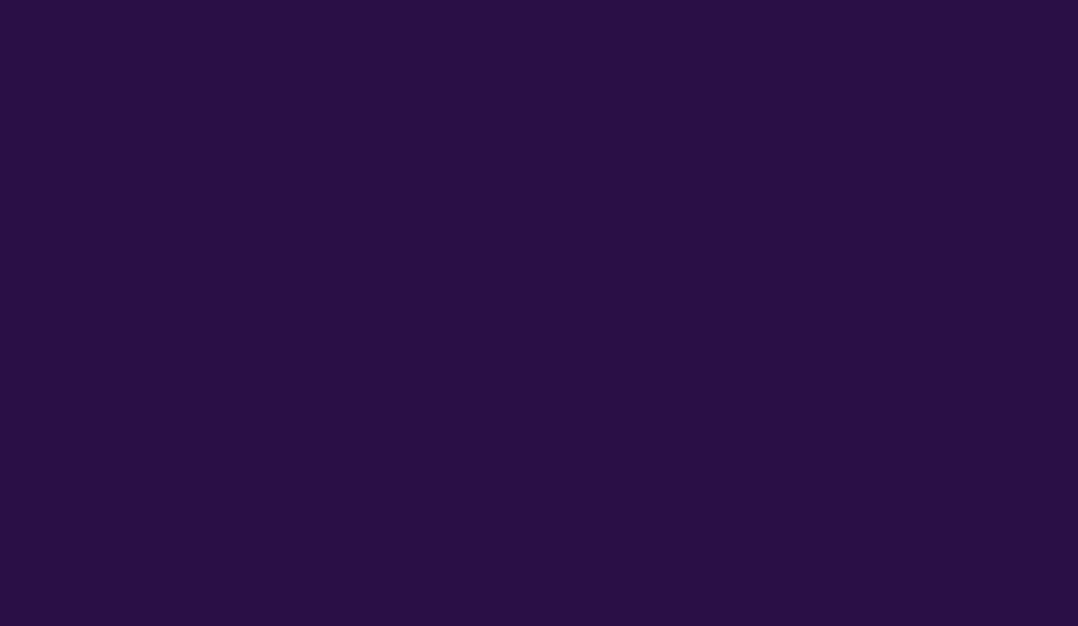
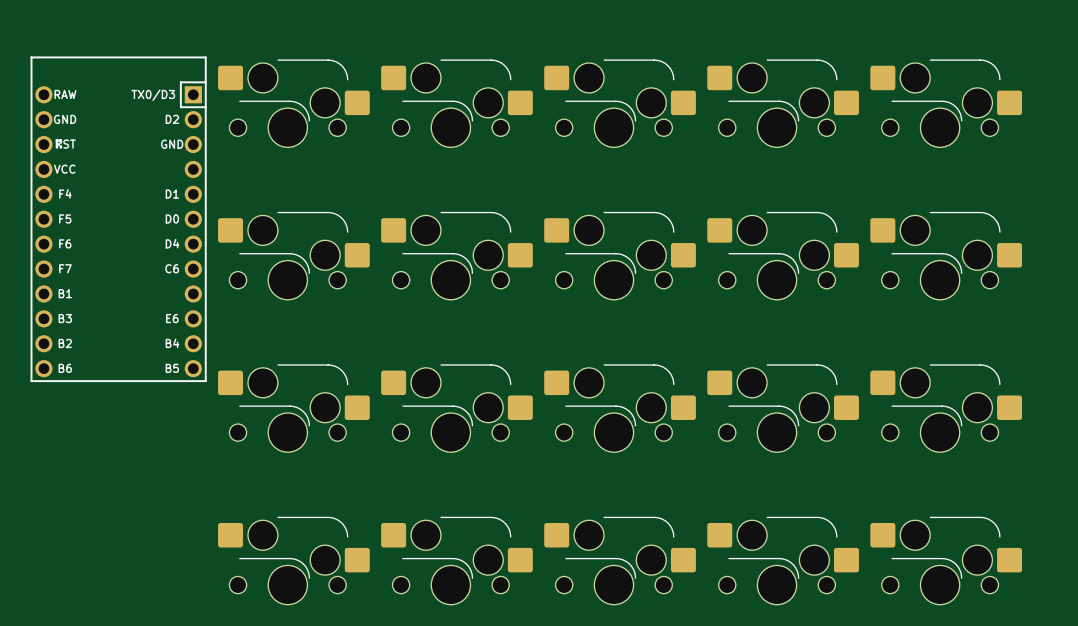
part: none -> (293, 103)
part: none -> (456, 103)
part: none -> (620, 103)
part: none -> (783, 103)
part: none -> (946, 103)
part: none -> (118, 219)
part: none -> (293, 255)
part: none -> (456, 255)
part: none -> (620, 255)
part: none -> (783, 255)
part: none -> (946, 255)
part: none -> (293, 408)
part: none -> (456, 408)
part: none -> (620, 408)
part: none -> (783, 408)
part: none -> (946, 408)
part: none -> (293, 560)
part: none -> (456, 560)
part: none -> (620, 560)
part: none -> (783, 560)
part: none -> (946, 560)

